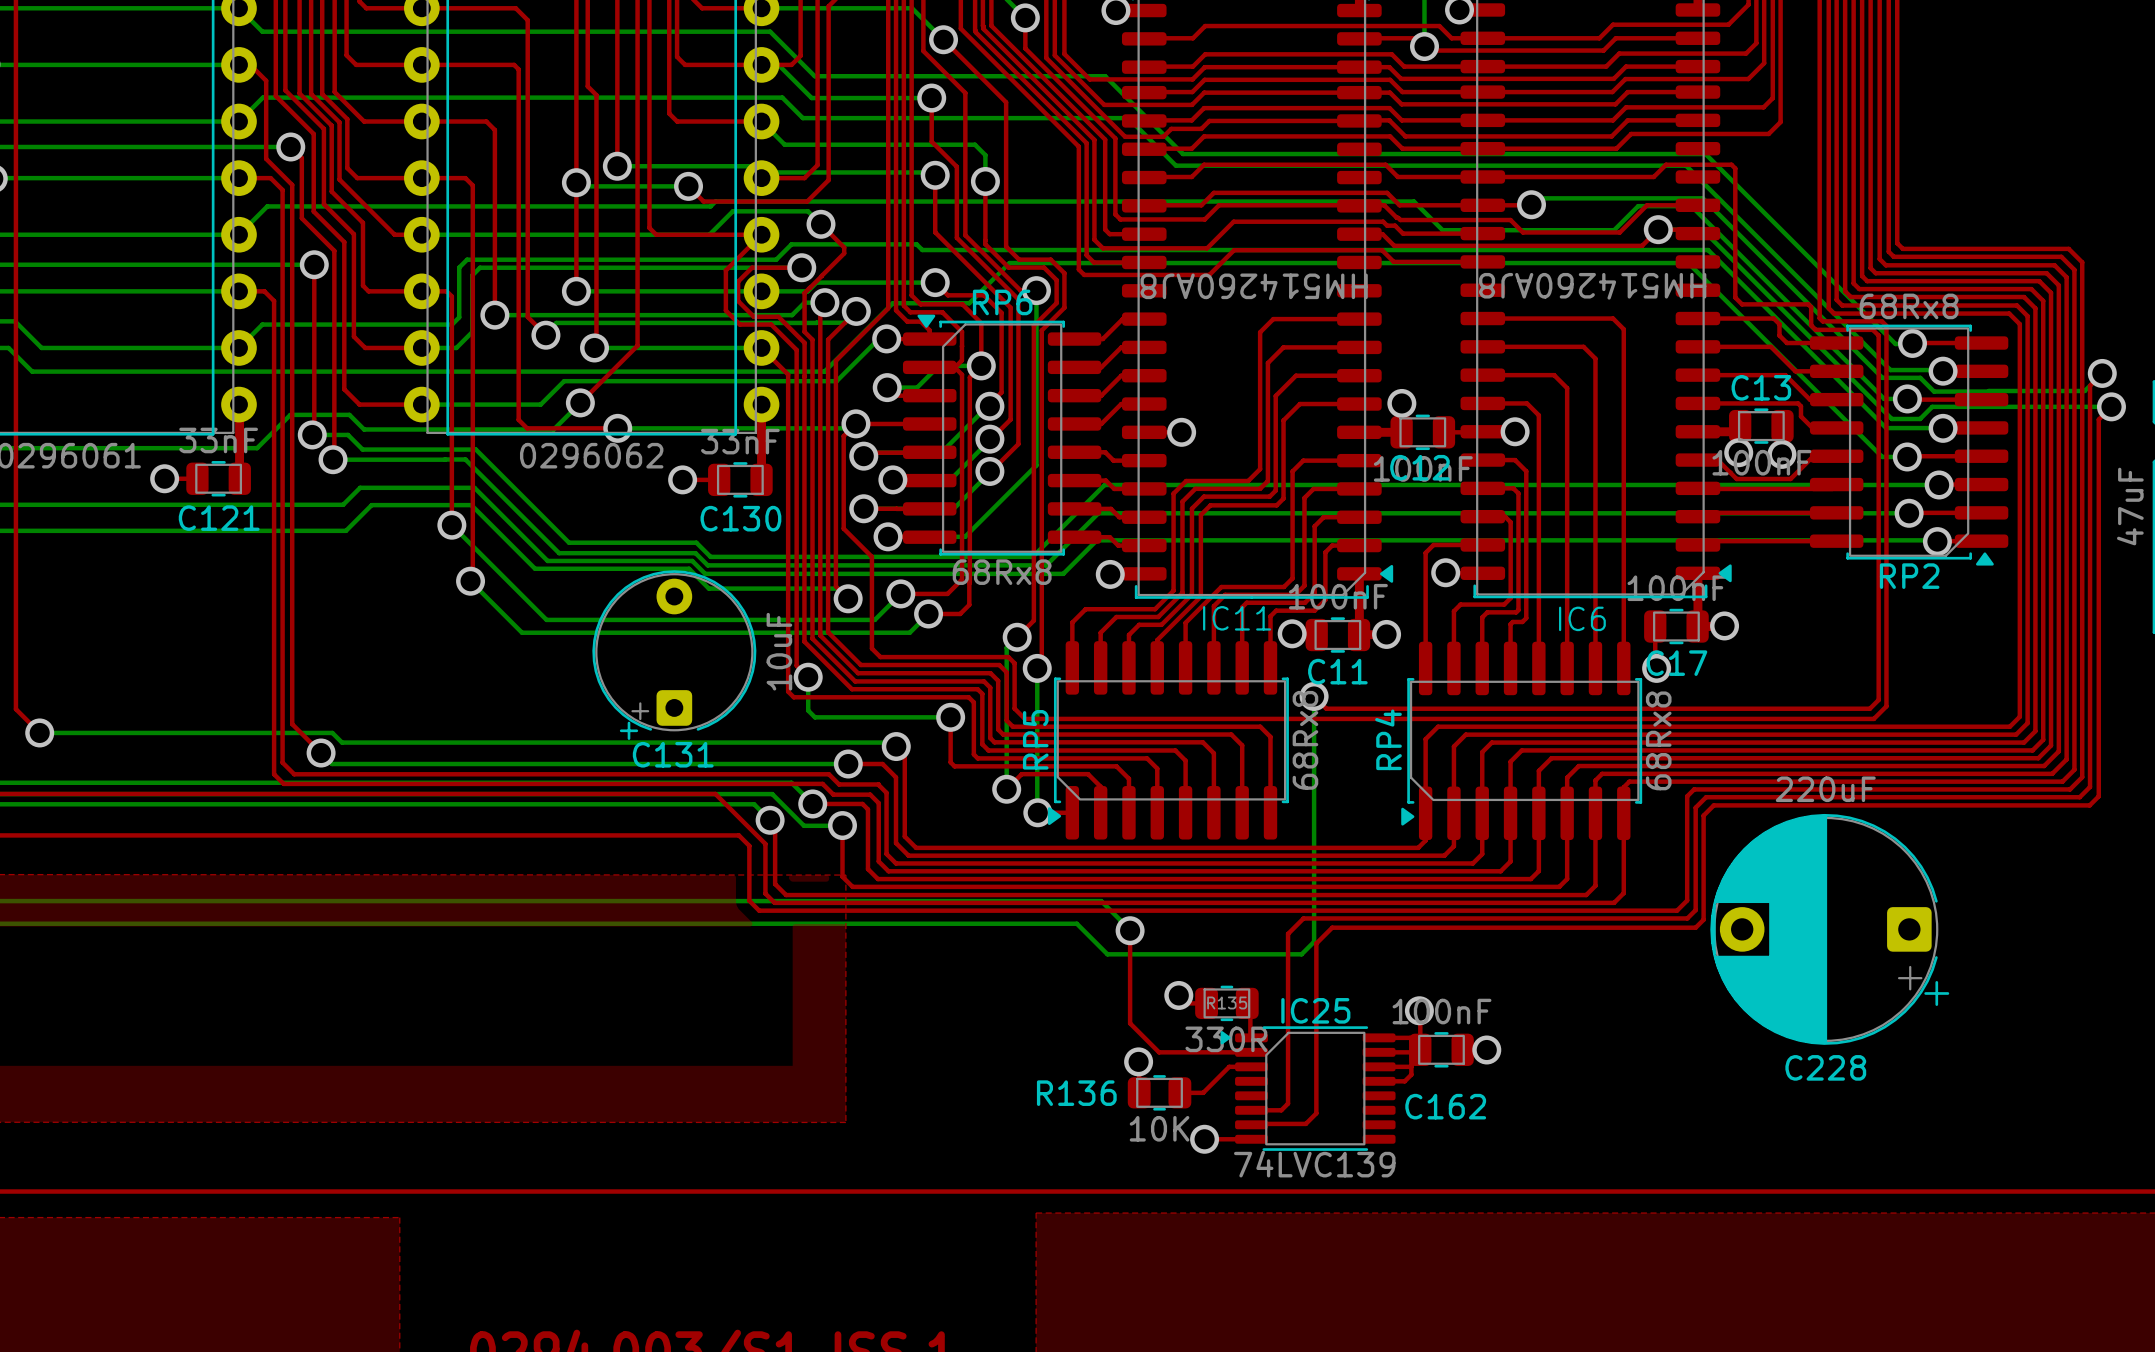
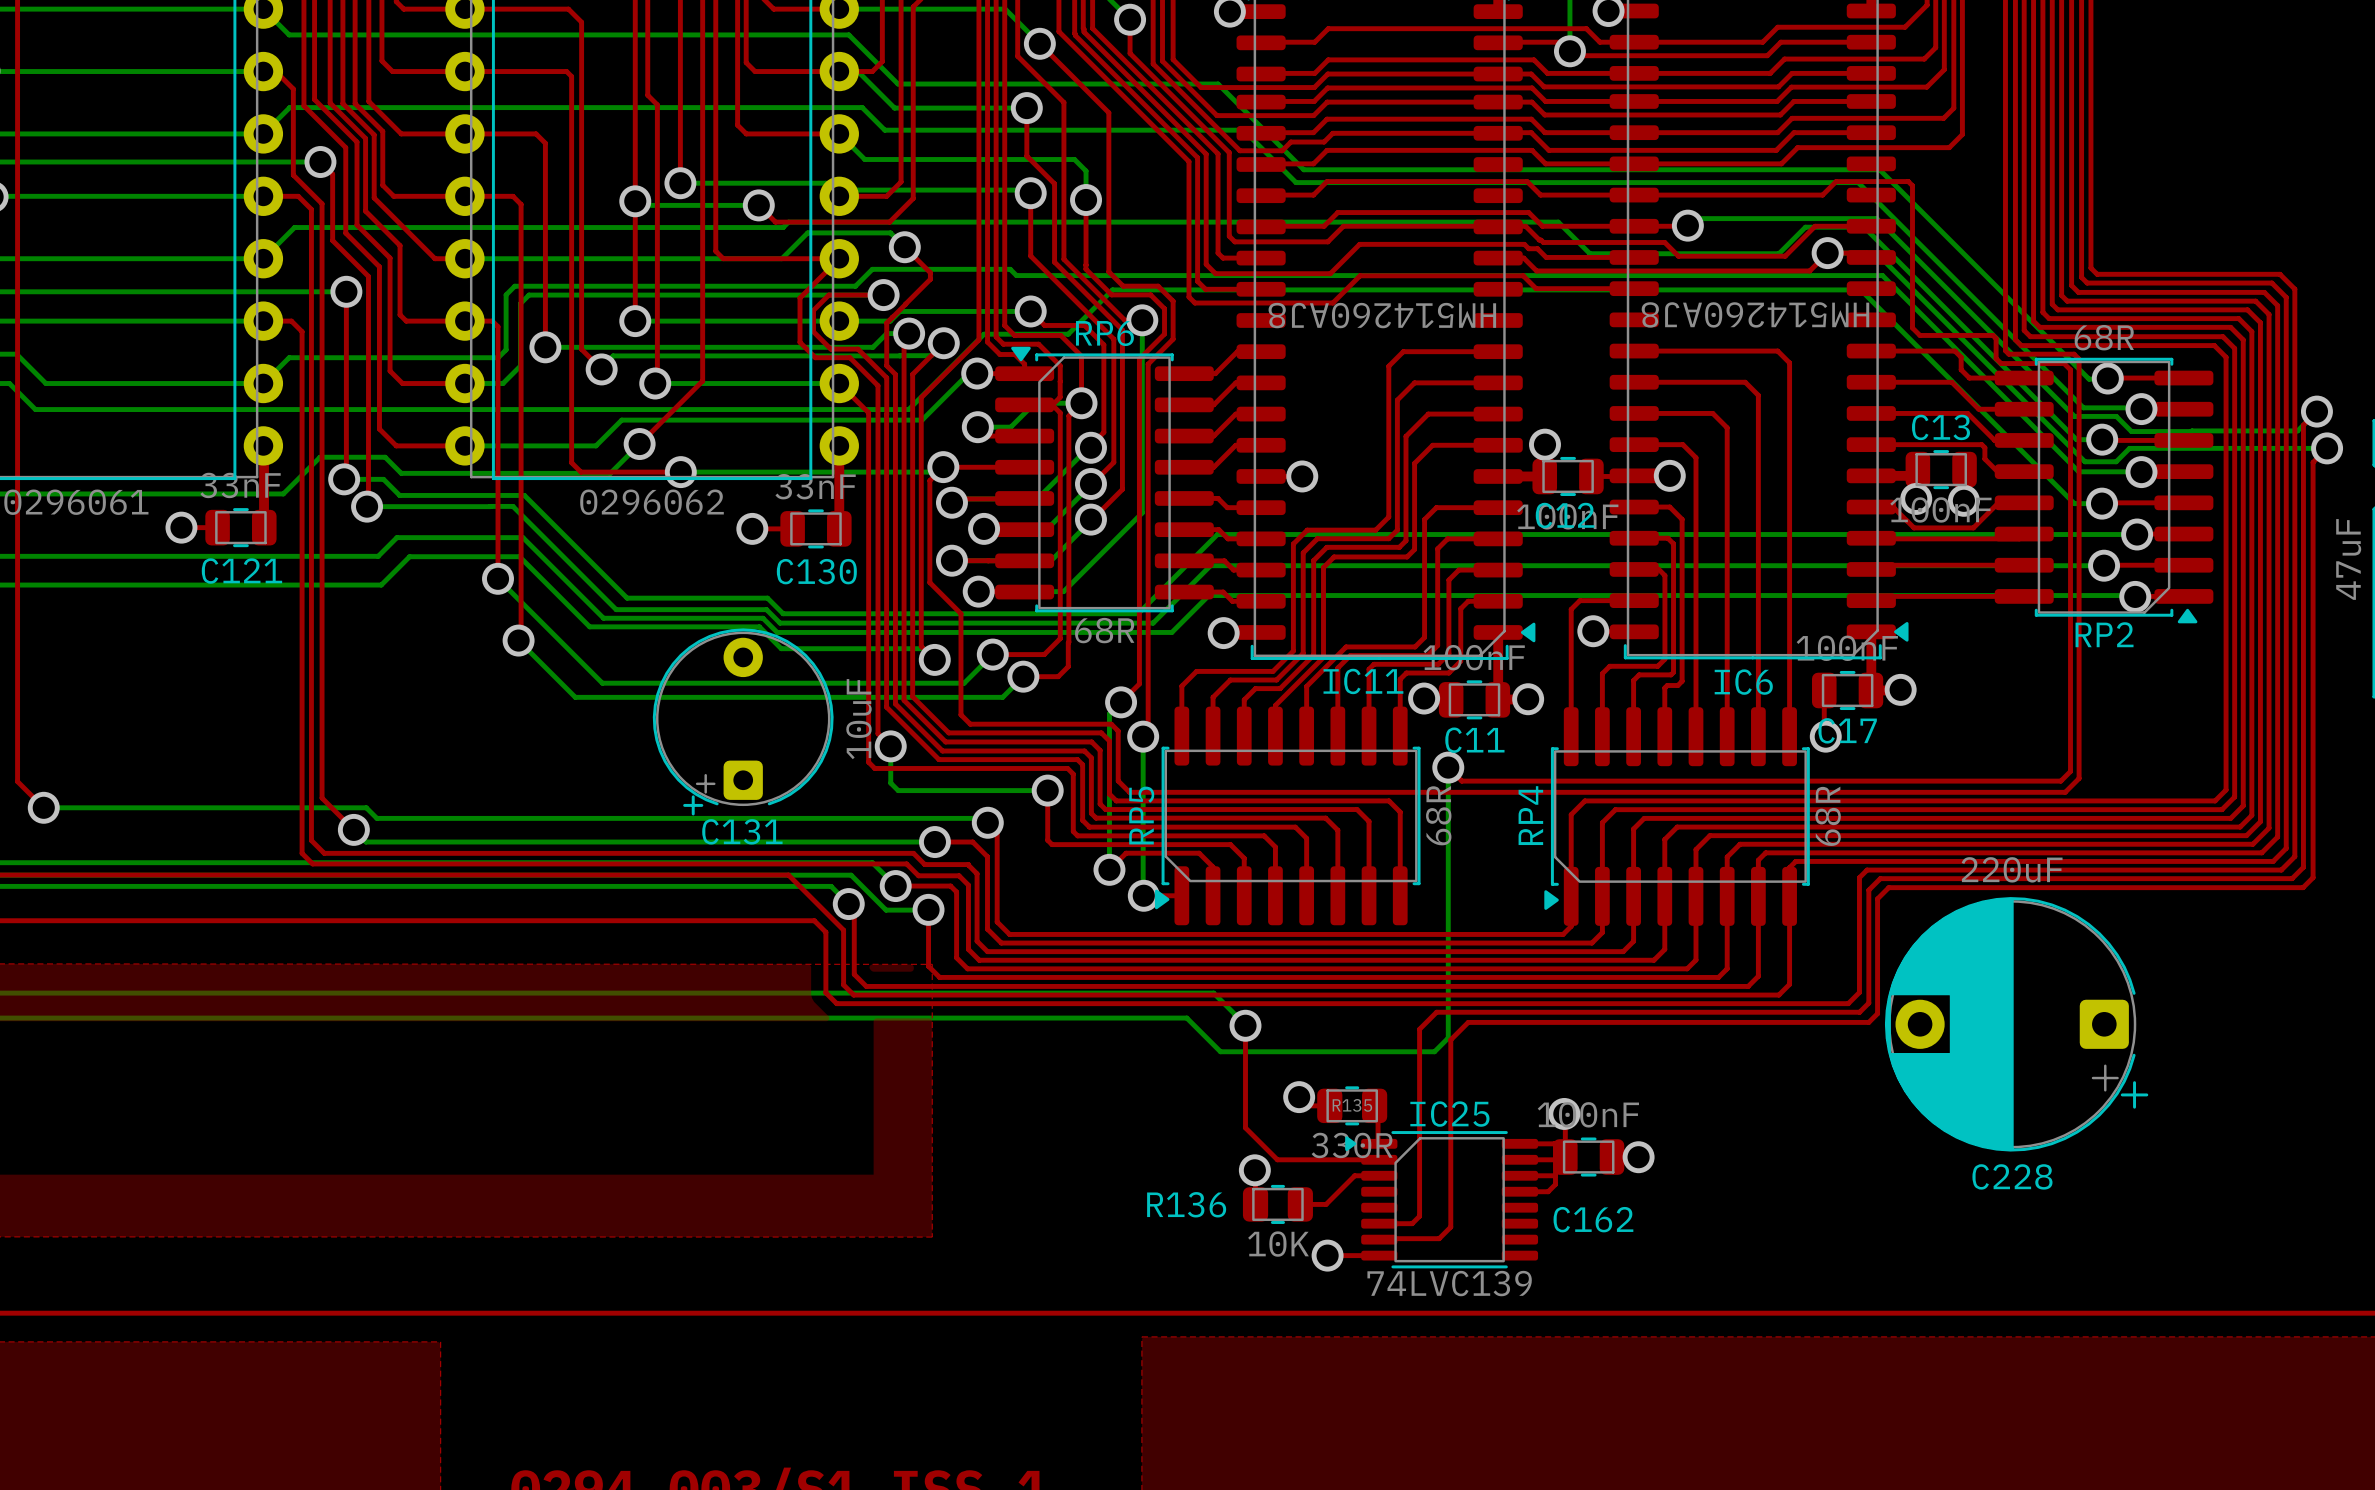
RP2 value: 68Rx8 (1909, 306) -> 68R (2104, 337)
RP6 value: 68Rx8 (1002, 572) -> 68R (1104, 630)
RP5 value: 68Rx8 (1305, 740) -> 68R (1438, 815)
RP4 value: 68Rx8 (1658, 740) -> 68R (1828, 816)

